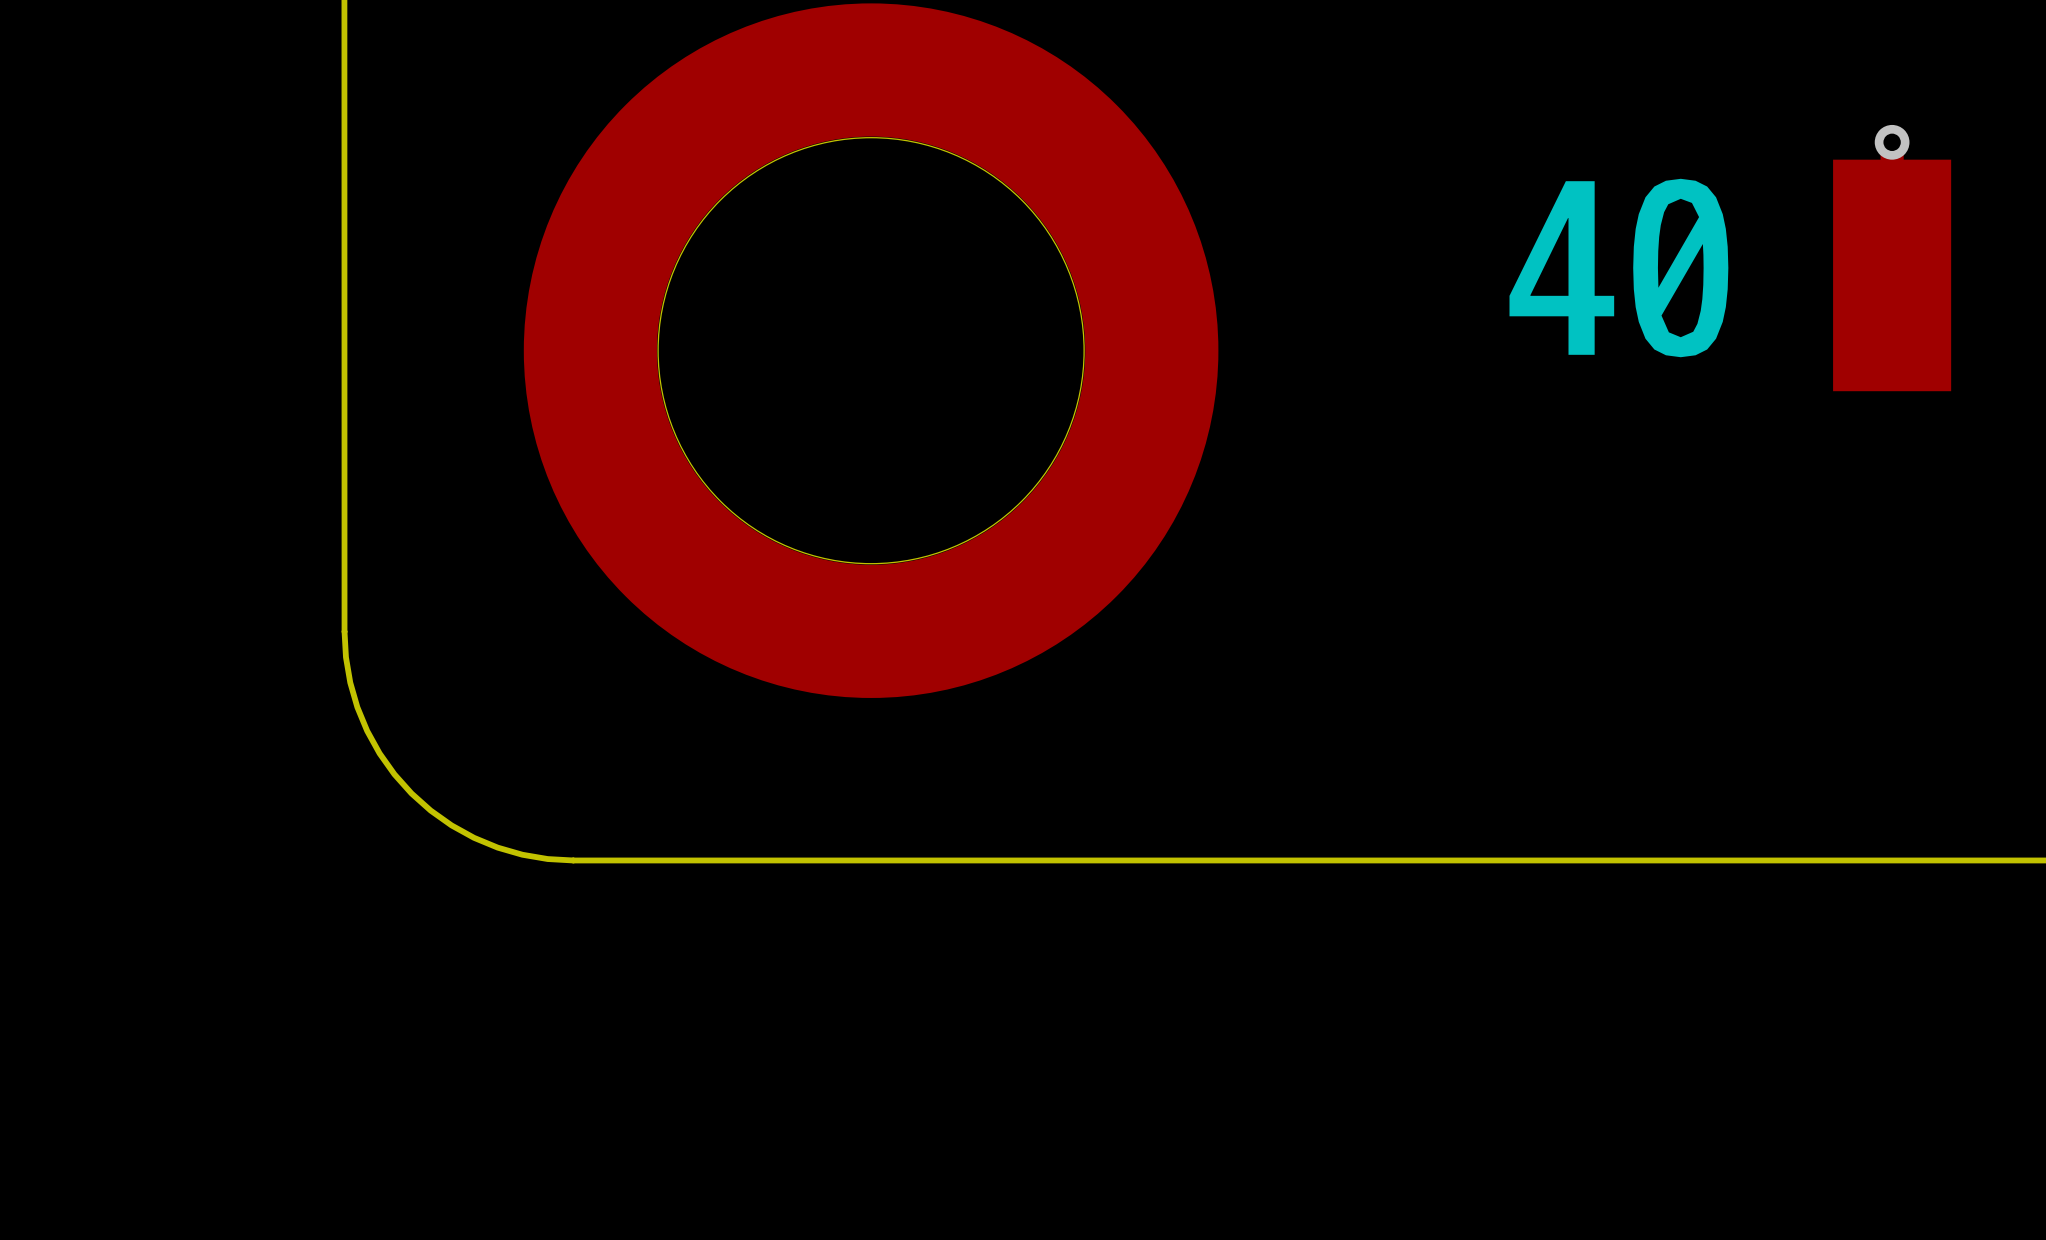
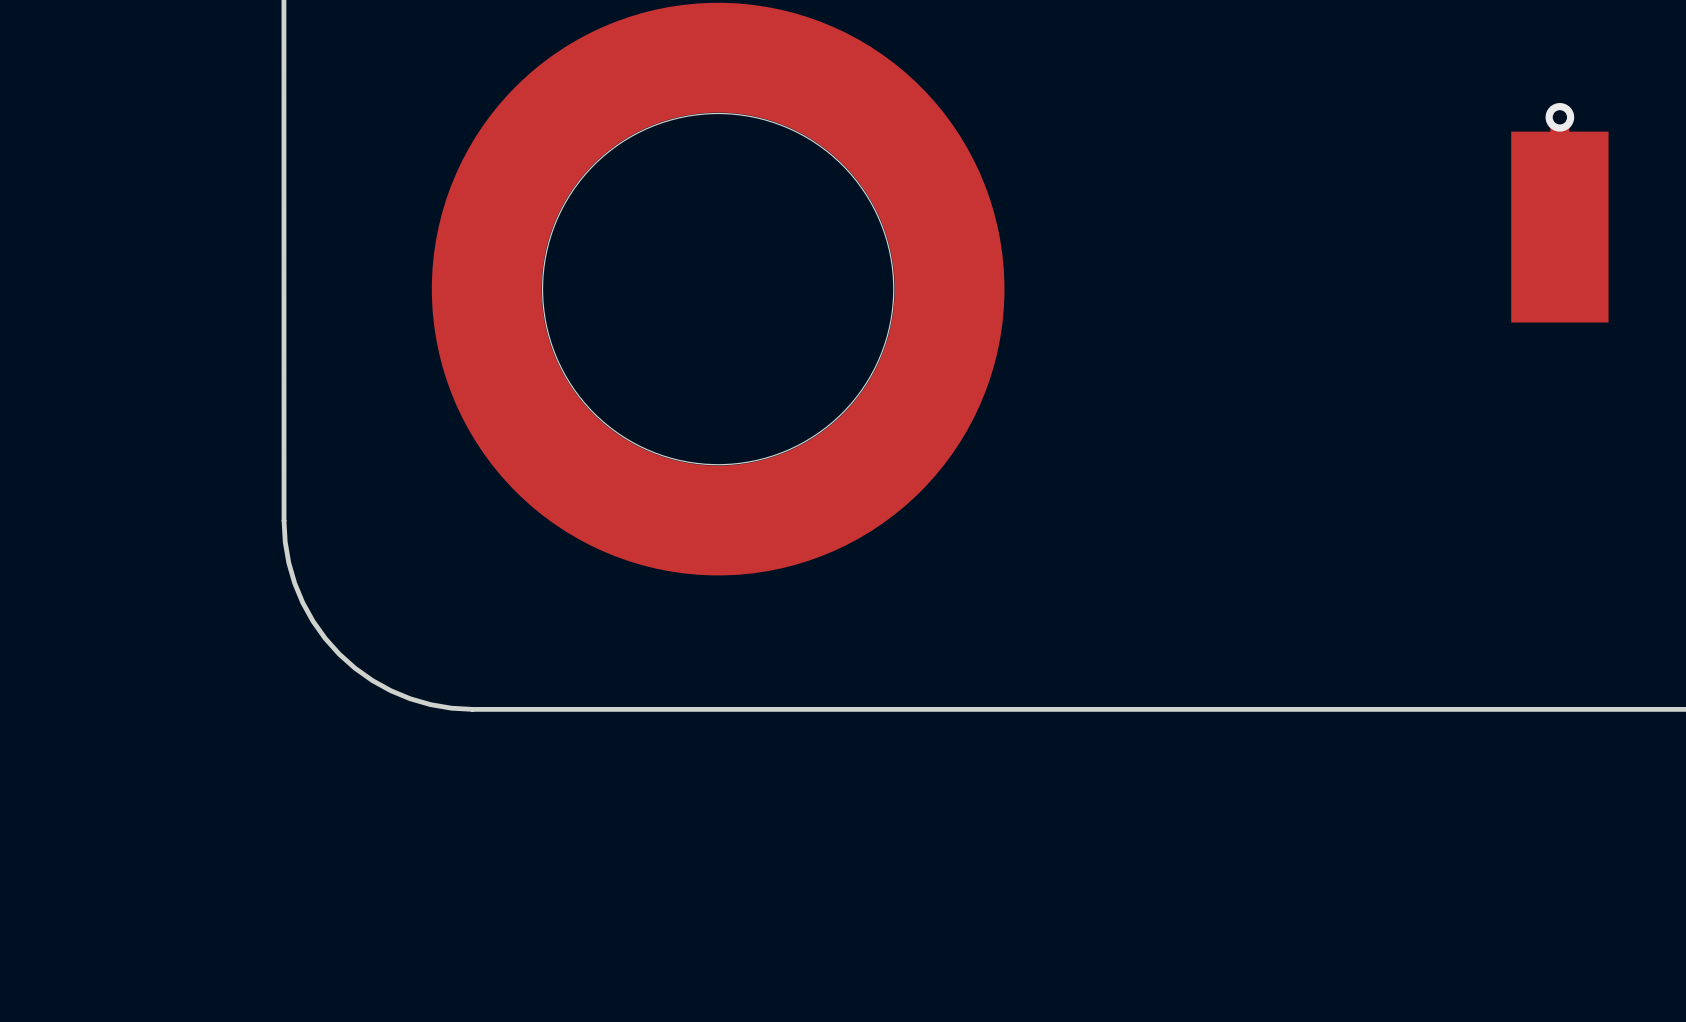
drawing: [1509, 178, 1729, 358] -> none

